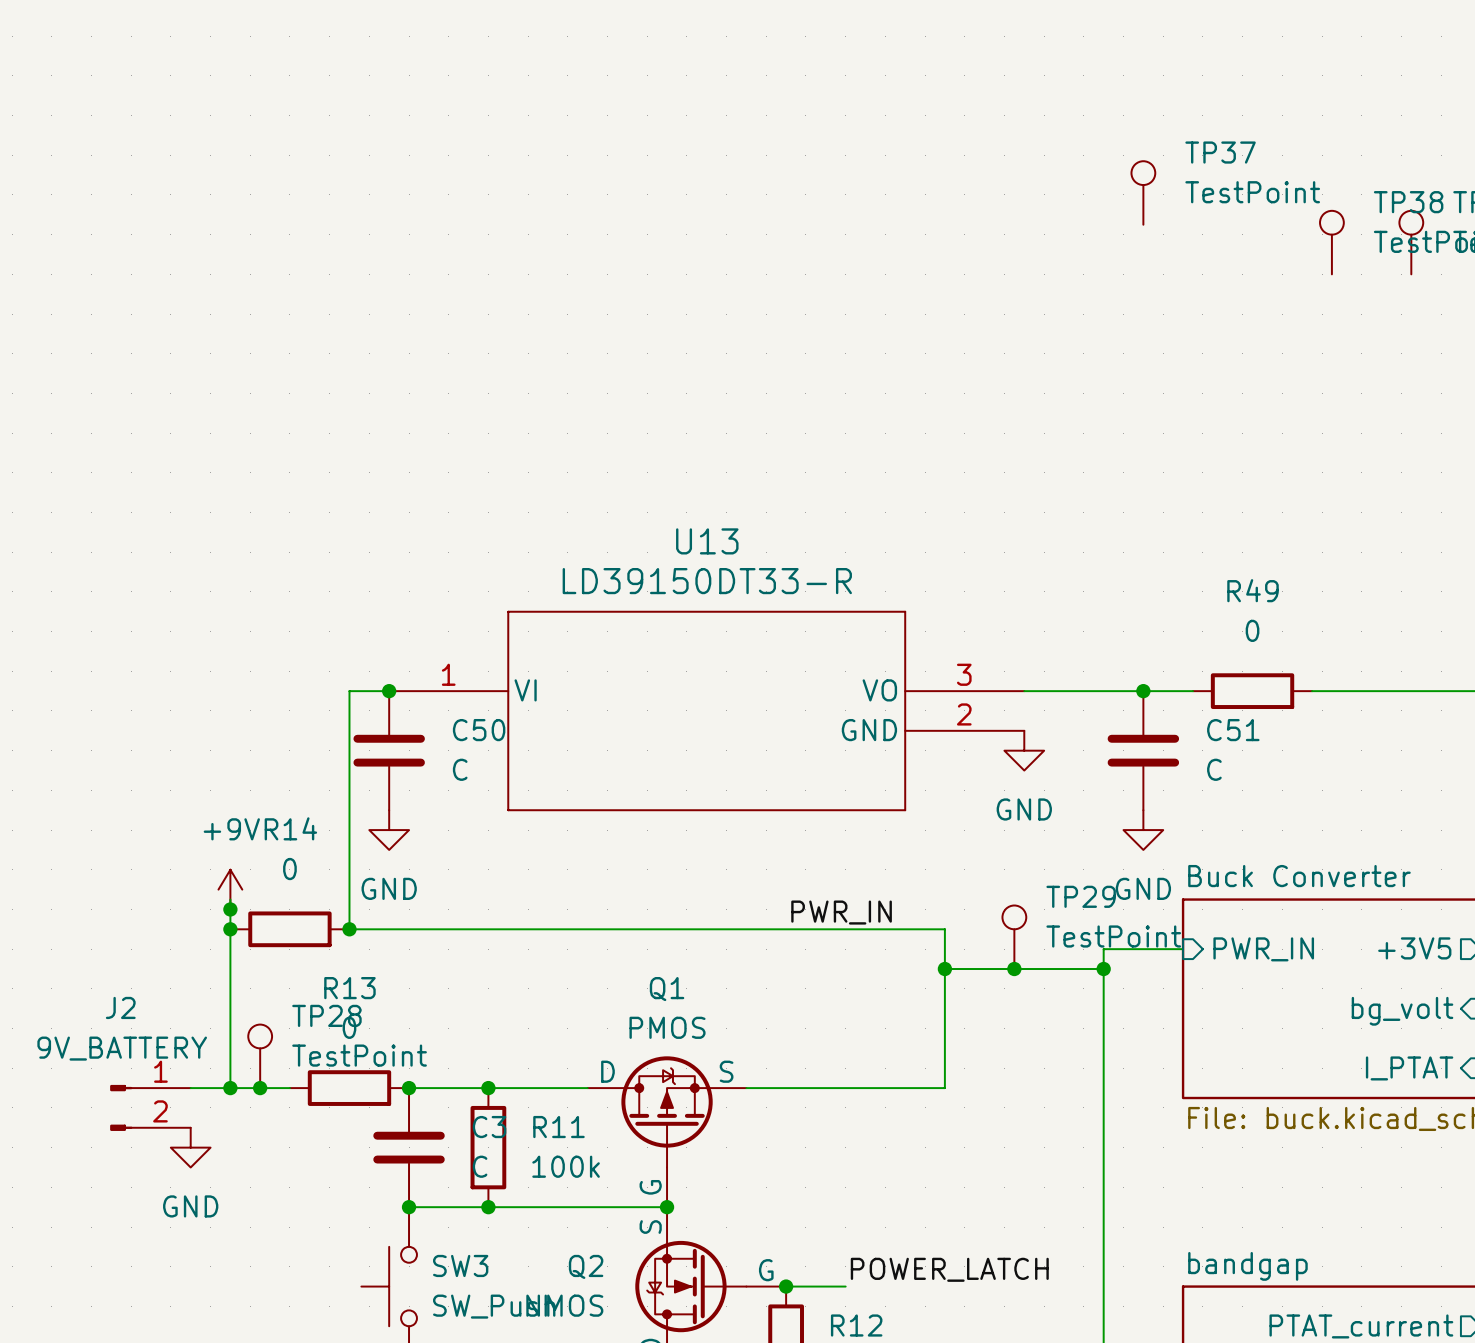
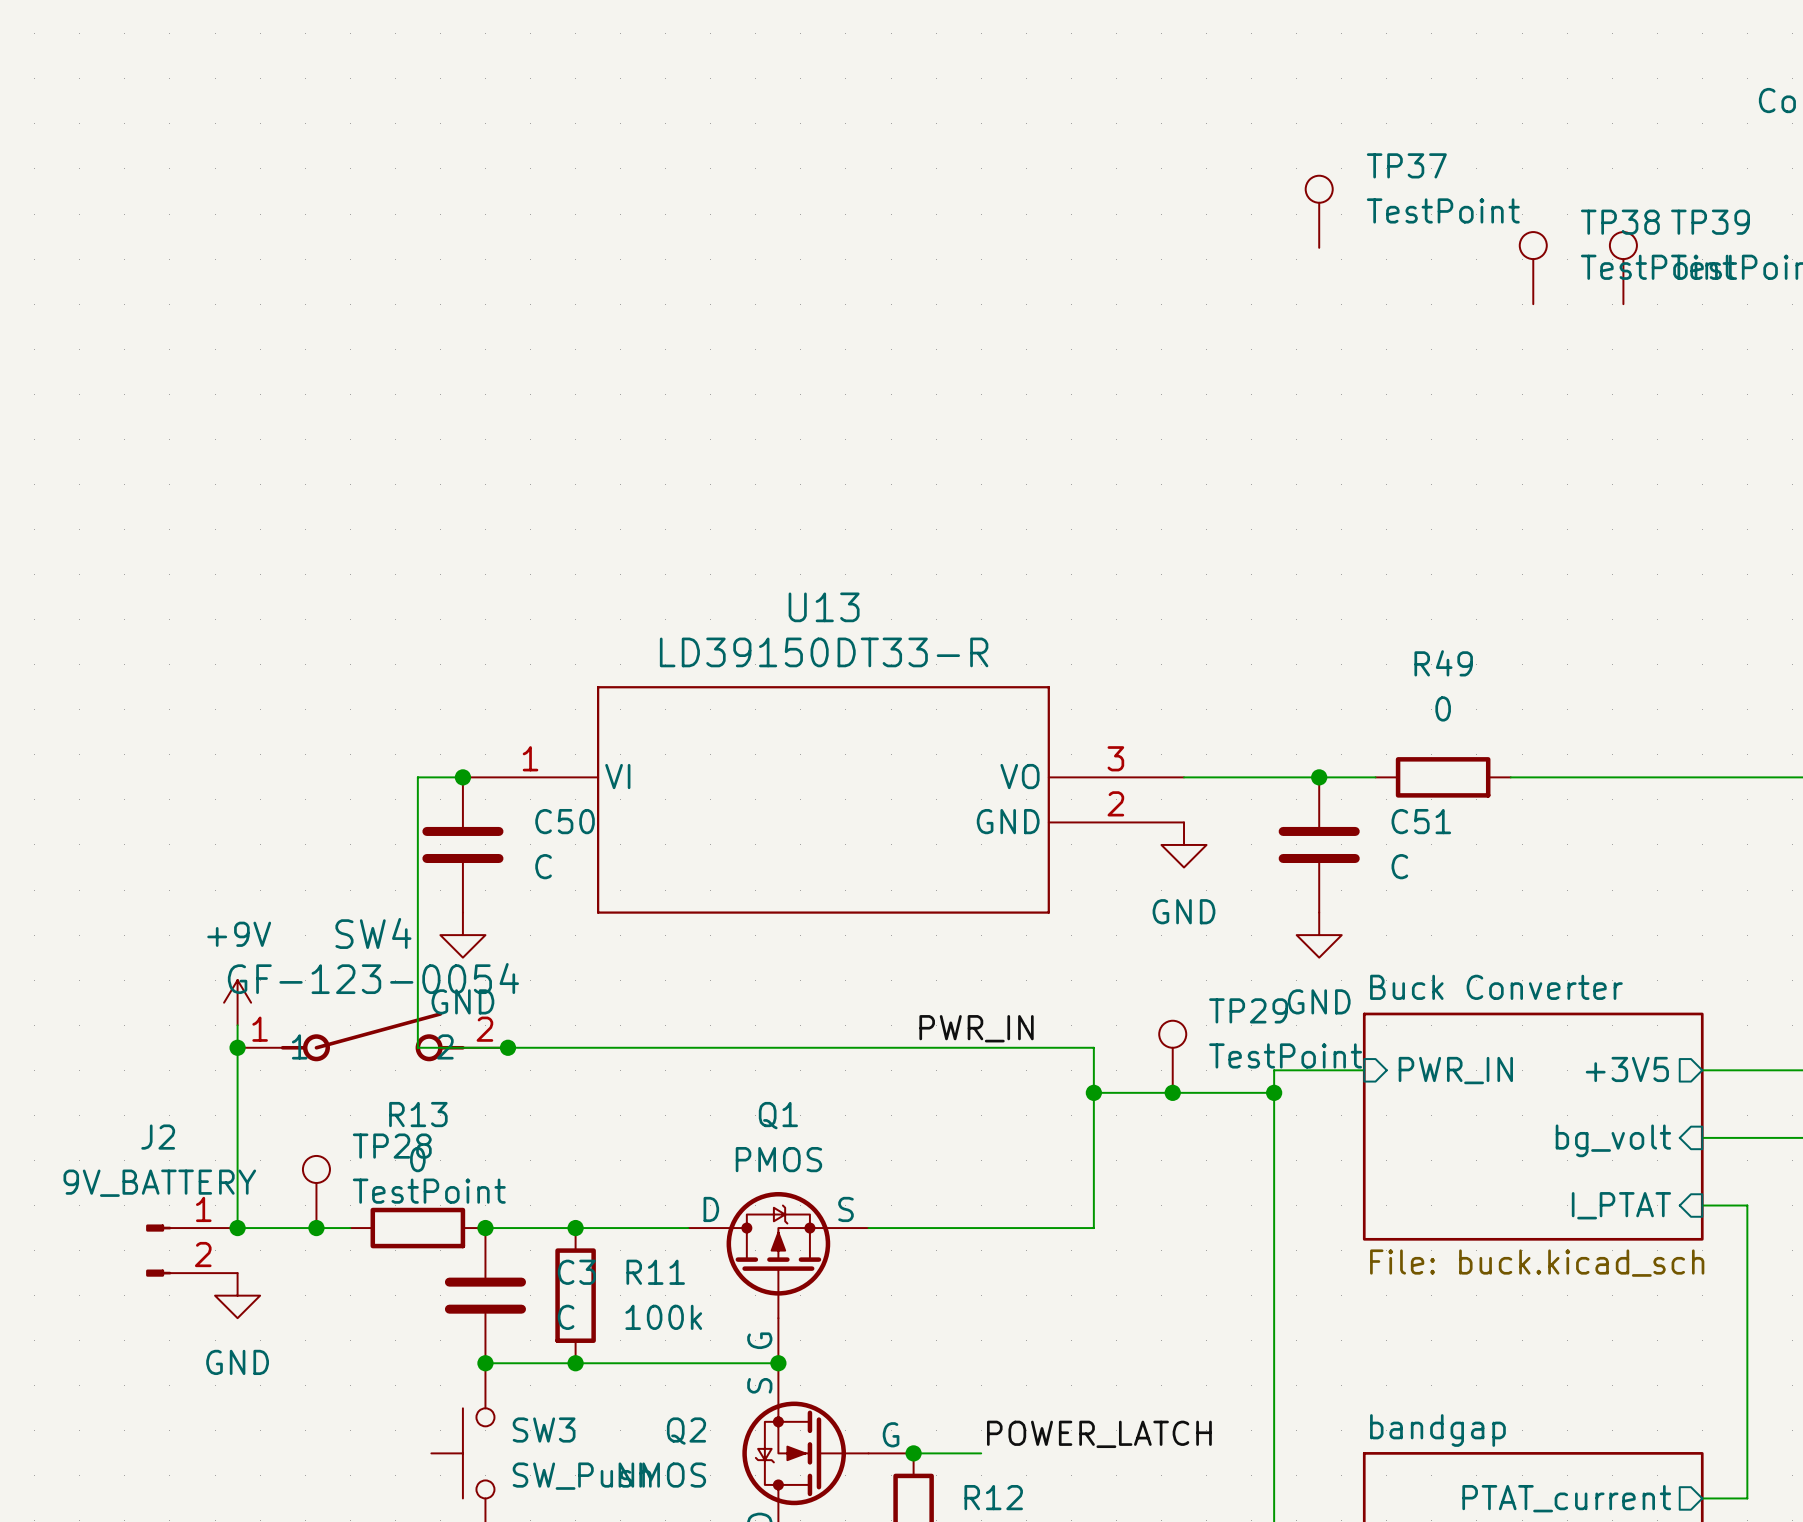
power symbol position: +9V (230, 889) -> +9V (237, 1002)
wire: (230, 899) (230, 1088) -> none
wire: none -> (237, 1025) (237, 1228)
junction: (230, 909) -> none
SW4: none -> GF-123-0054 (372, 1036)
junction: none -> (237, 1047)
junction: (230, 929) -> none
R14: 0 (289, 929) -> none
junction: (349, 929) -> none
junction: none -> (507, 1047)
junction position: (230, 1088) -> (237, 1228)

